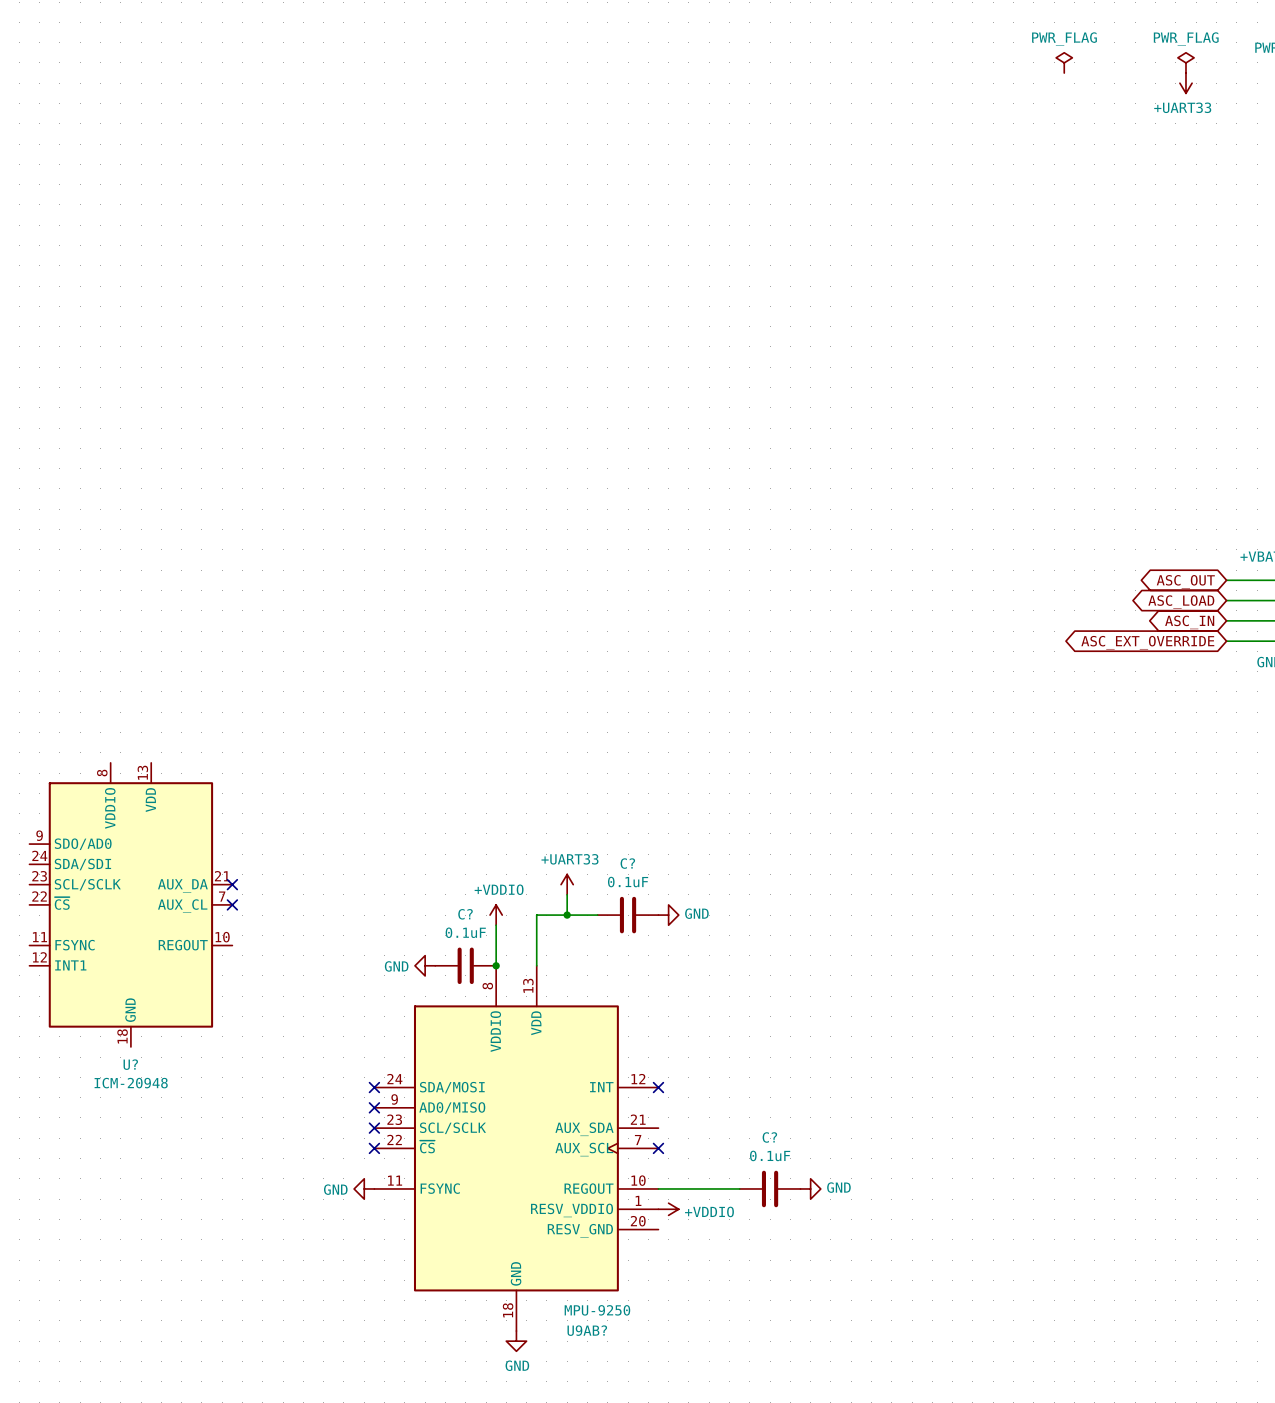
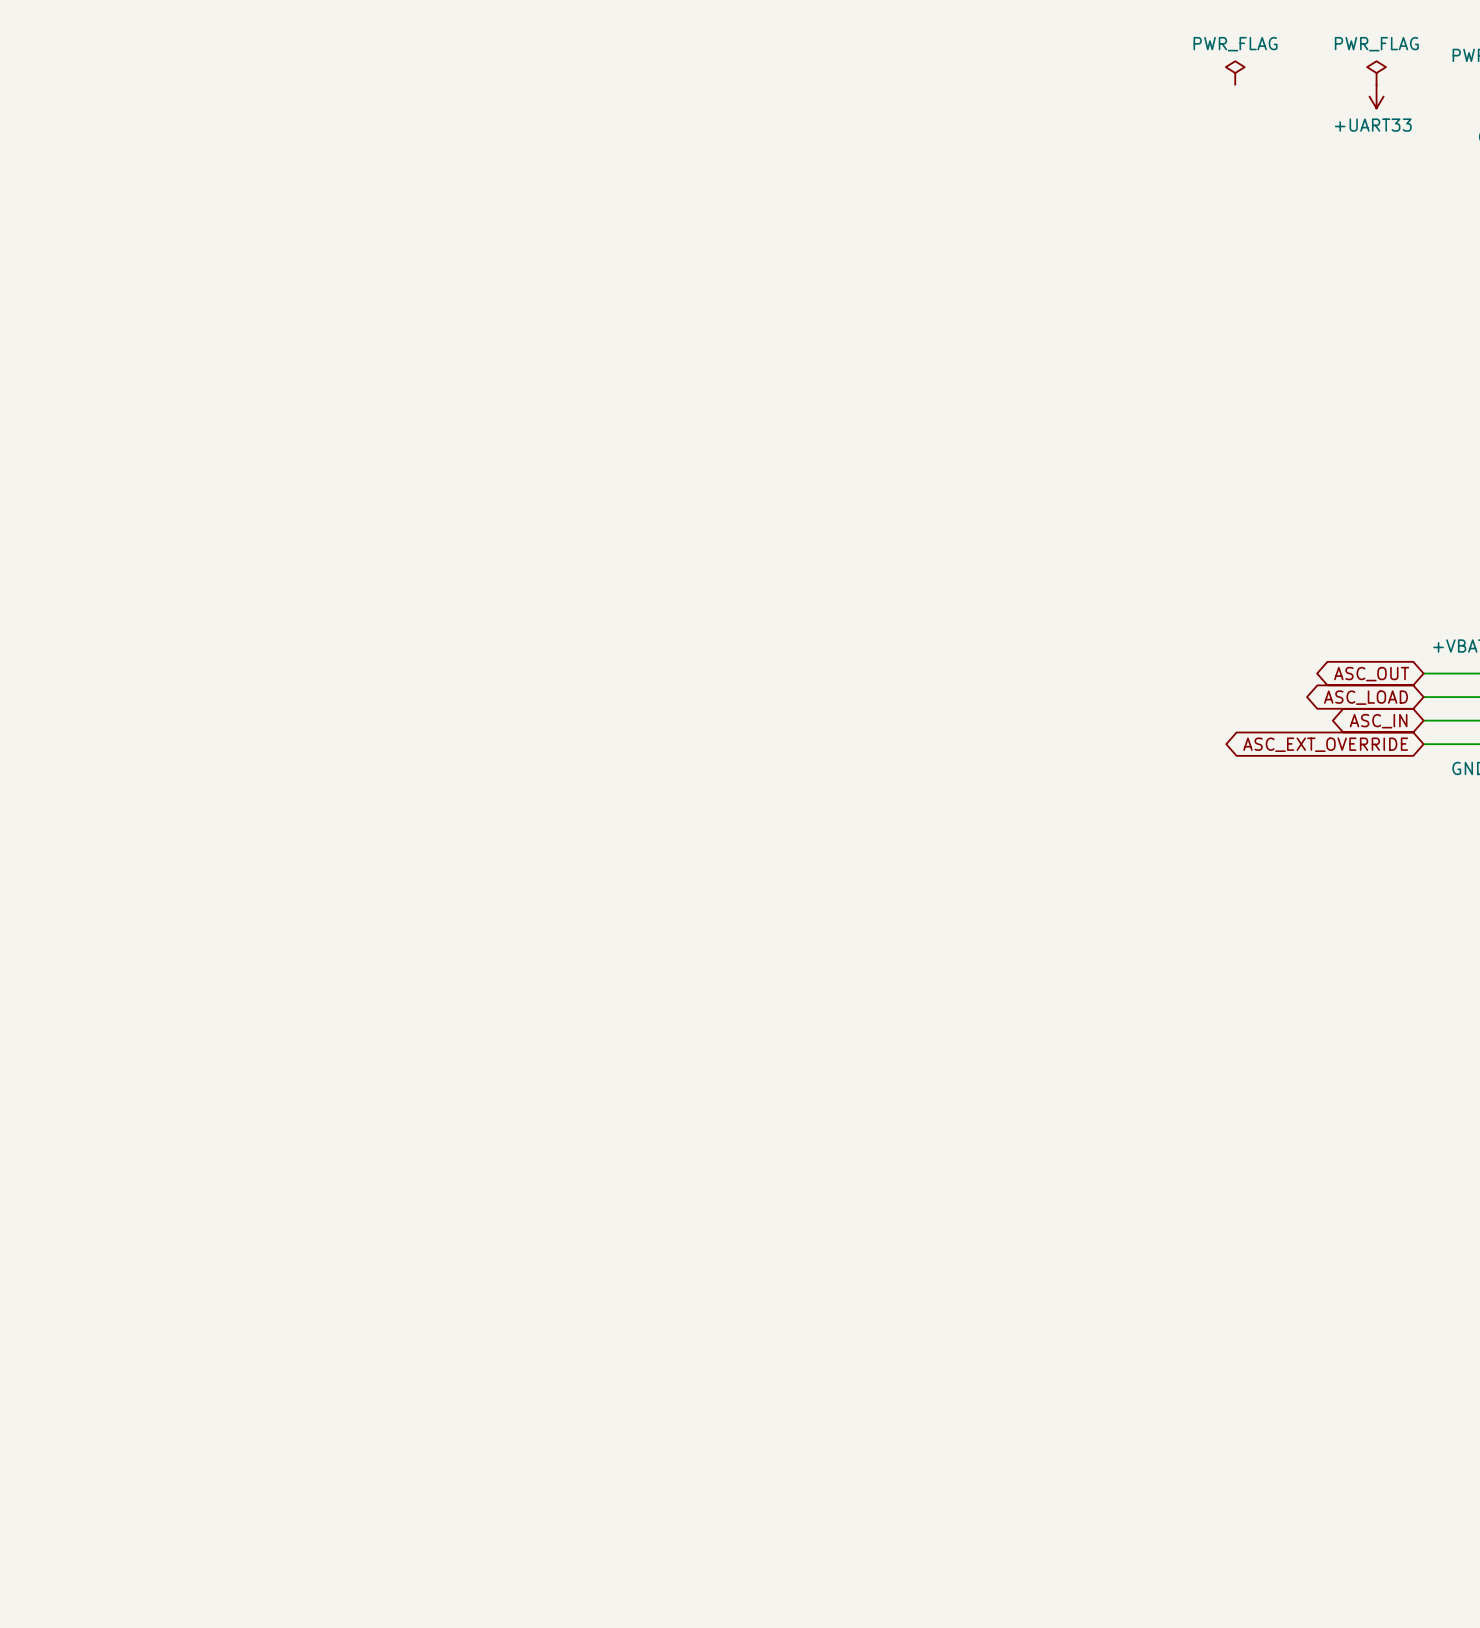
no-connect mark: (232, 884) -> none
power symbol: +UART33 (567, 884) -> none
wire: (567, 894) (567, 915) -> none
U?: ICM-20948 (130, 904) -> none
no-connect mark: (232, 904) -> none
power symbol: +VDDIO (496, 915) -> none
junction: (567, 915) -> none
wire: (597, 915) (536, 915) (536, 965) -> none
C?: 0.1uF (628, 915) -> none
power symbol: GND (668, 915) -> none
wire: (496, 925) (496, 965) -> none
power symbol: GND (425, 965) -> none
C?: 0.1uF (465, 965) -> none
junction: (496, 965) -> none
no-connect mark: (374, 1087) -> none
no-connect mark: (658, 1087) -> none
no-connect mark: (374, 1107) -> none
no-connect mark: (374, 1128) -> none
no-connect mark: (374, 1148) -> none
U9AB?: MPU-9250 (516, 1148) -> none
no-connect mark: (658, 1148) -> none
power symbol: GND (364, 1188) -> none
wire: (658, 1188) (739, 1188) -> none
C?: 0.1uF (770, 1188) -> none
power symbol: GND (810, 1188) -> none
power symbol: +VDDIO (668, 1209) -> none
power symbol: GND (516, 1341) -> none

